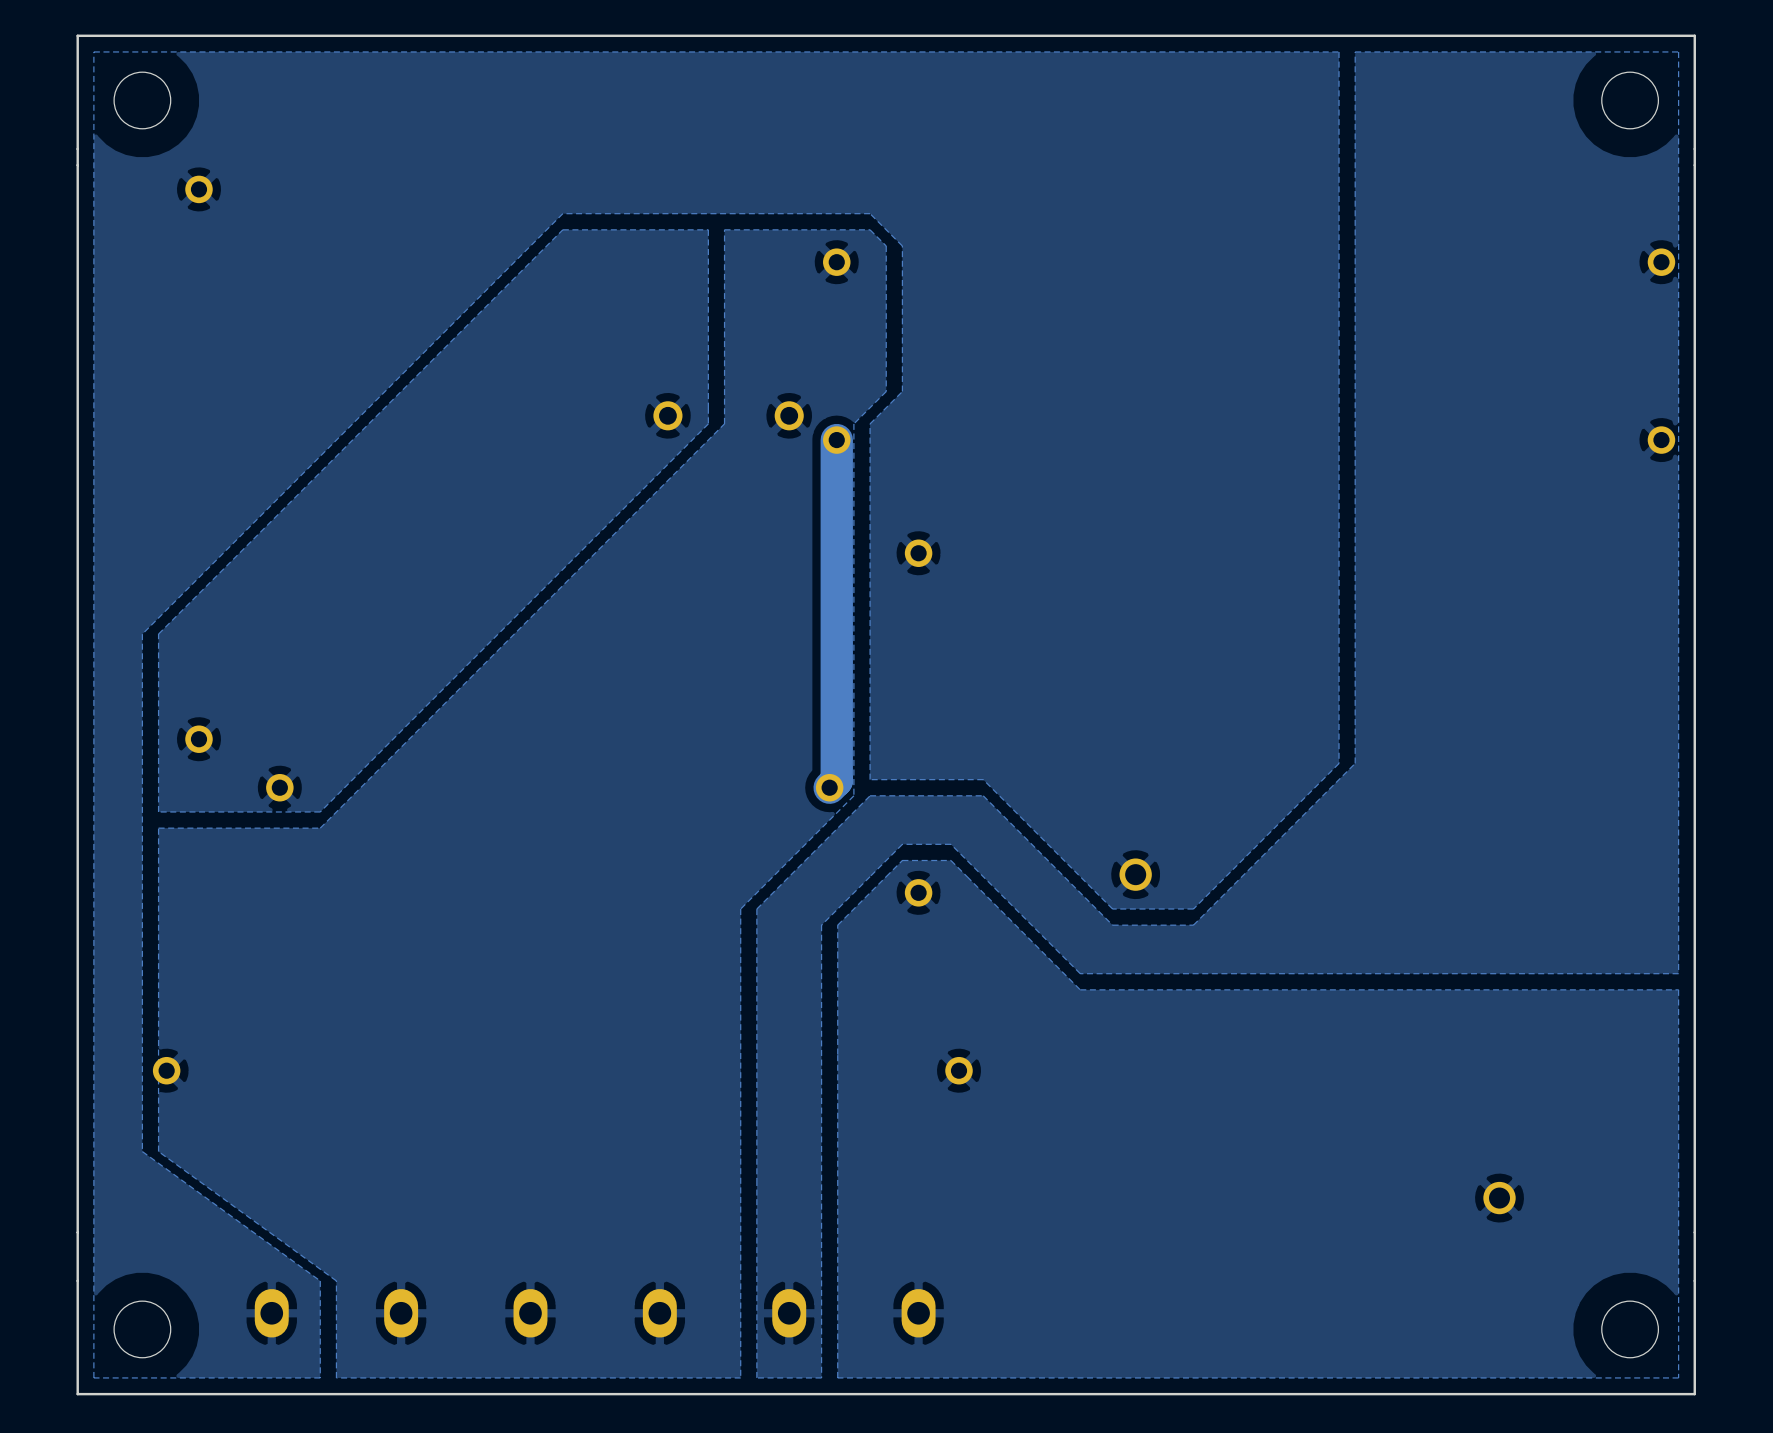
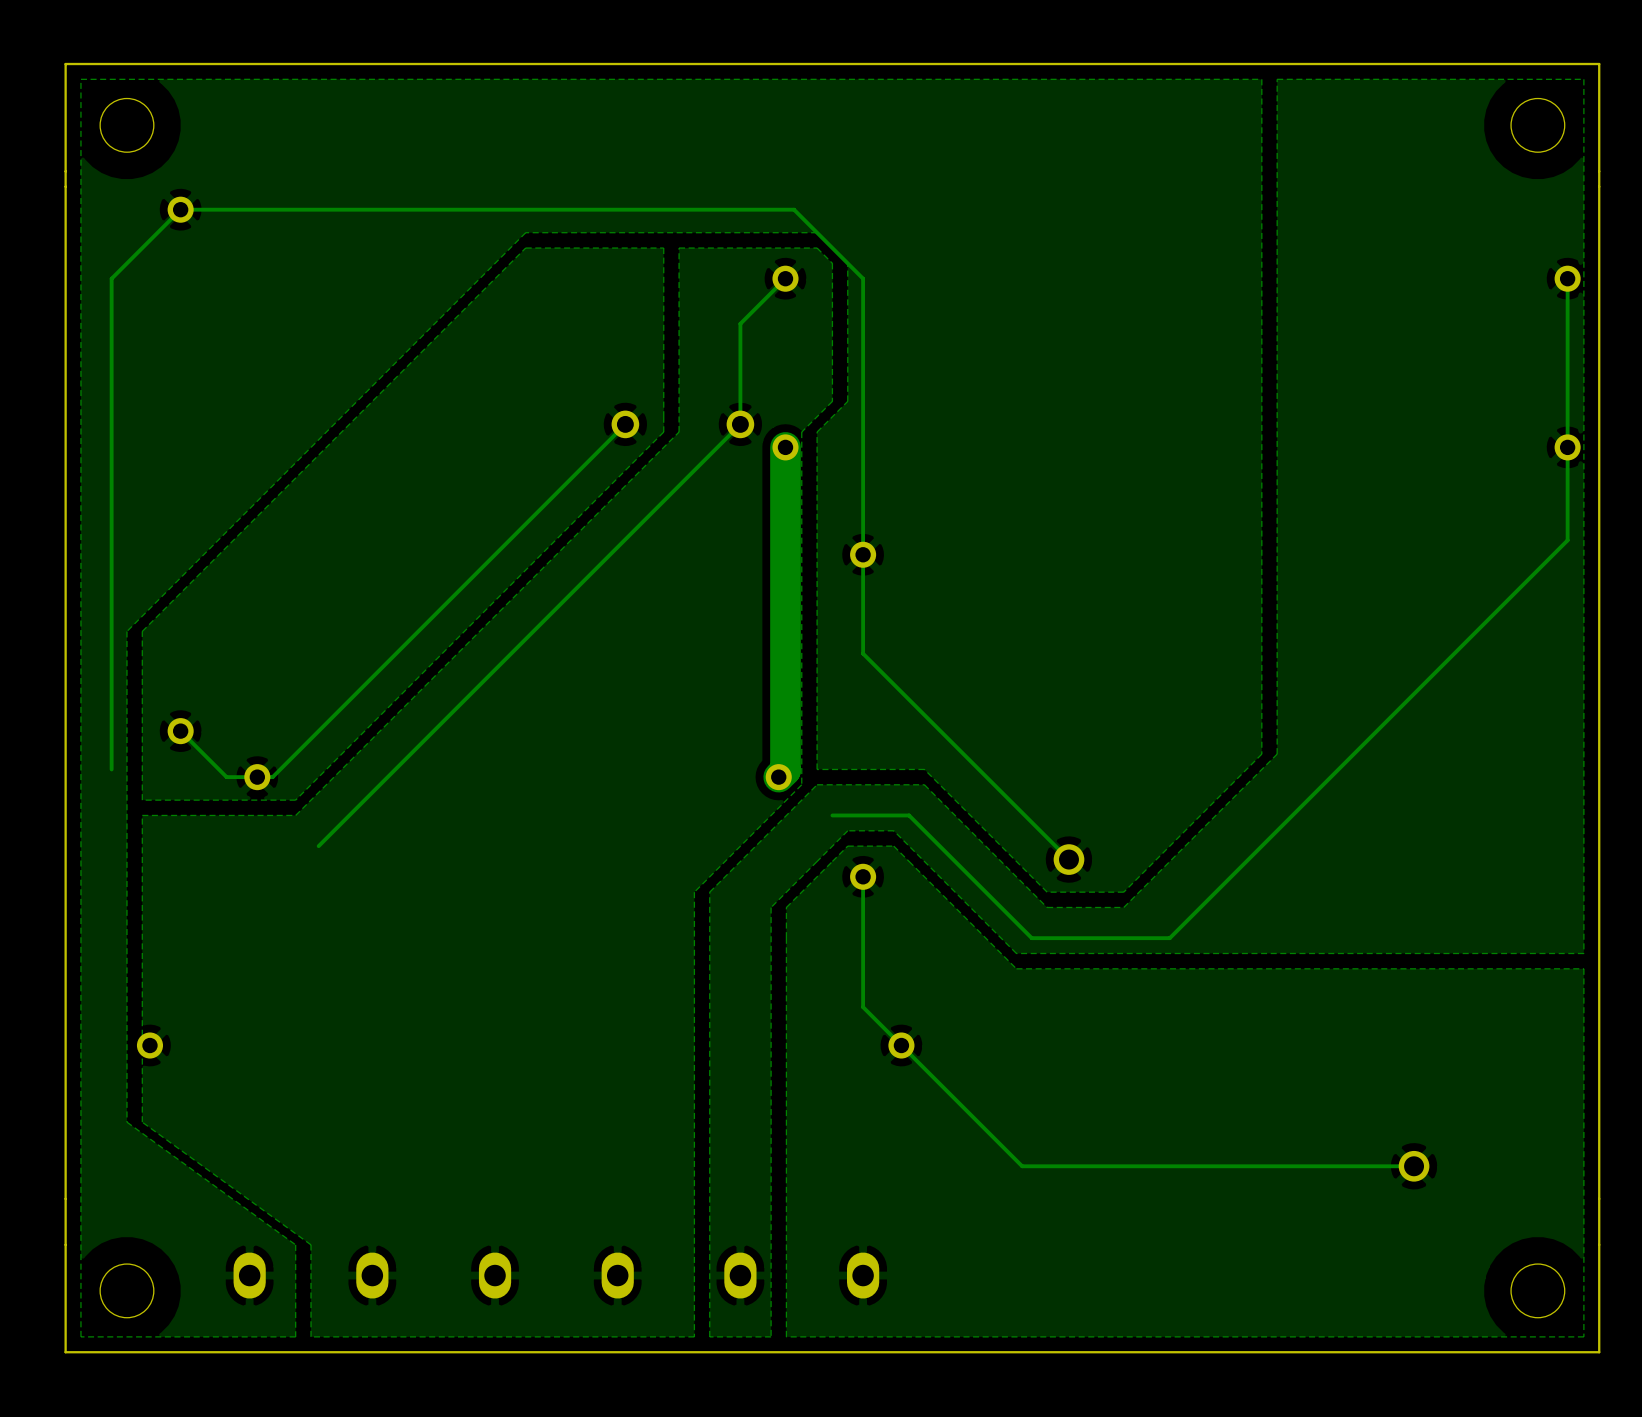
track: none -> (785, 278) (740, 323) (740, 424) (318, 846)
track: none -> (1567, 278) (1567, 540) (1169, 938) (1031, 938) (909, 815) (832, 815)
track: none -> (625, 424) (272, 777) (226, 777) (180, 731)
track: none -> (111, 769) (111, 278) (180, 209) (794, 209) (863, 278) (863, 653) (1068, 859)
track: none -> (863, 876) (863, 1007) (1022, 1166) (1414, 1166)

